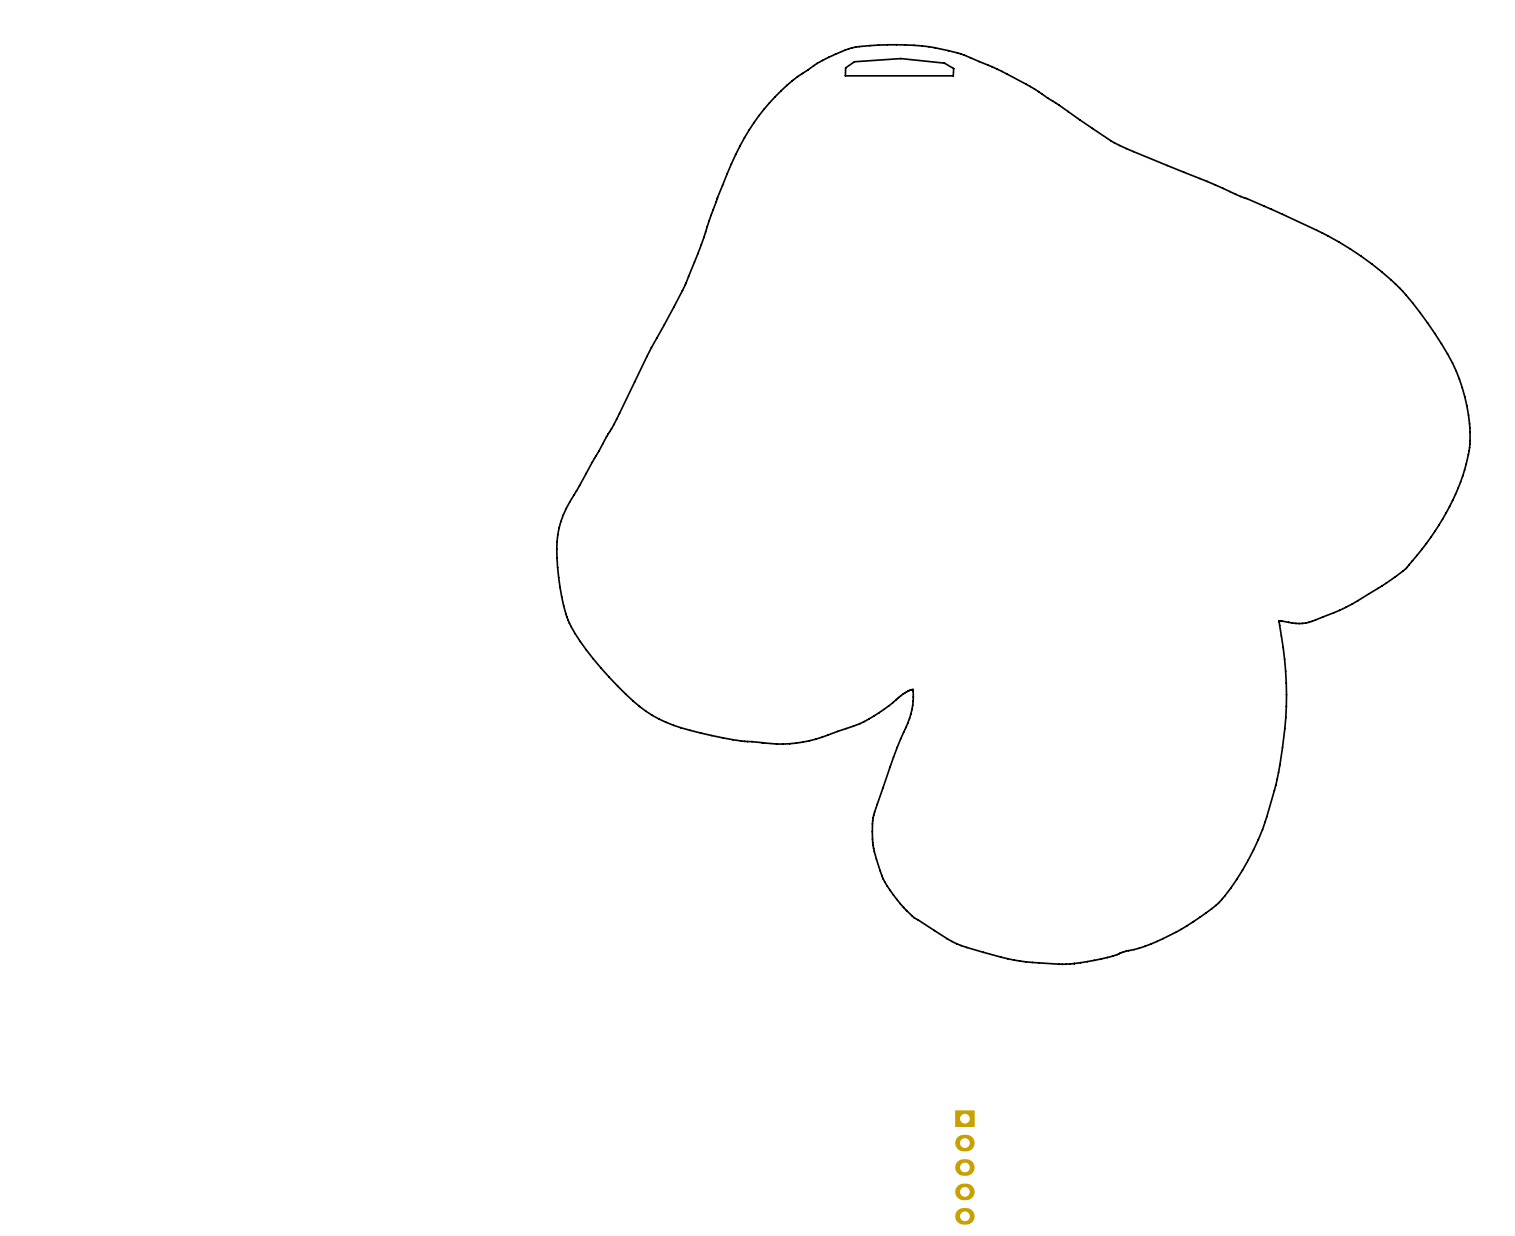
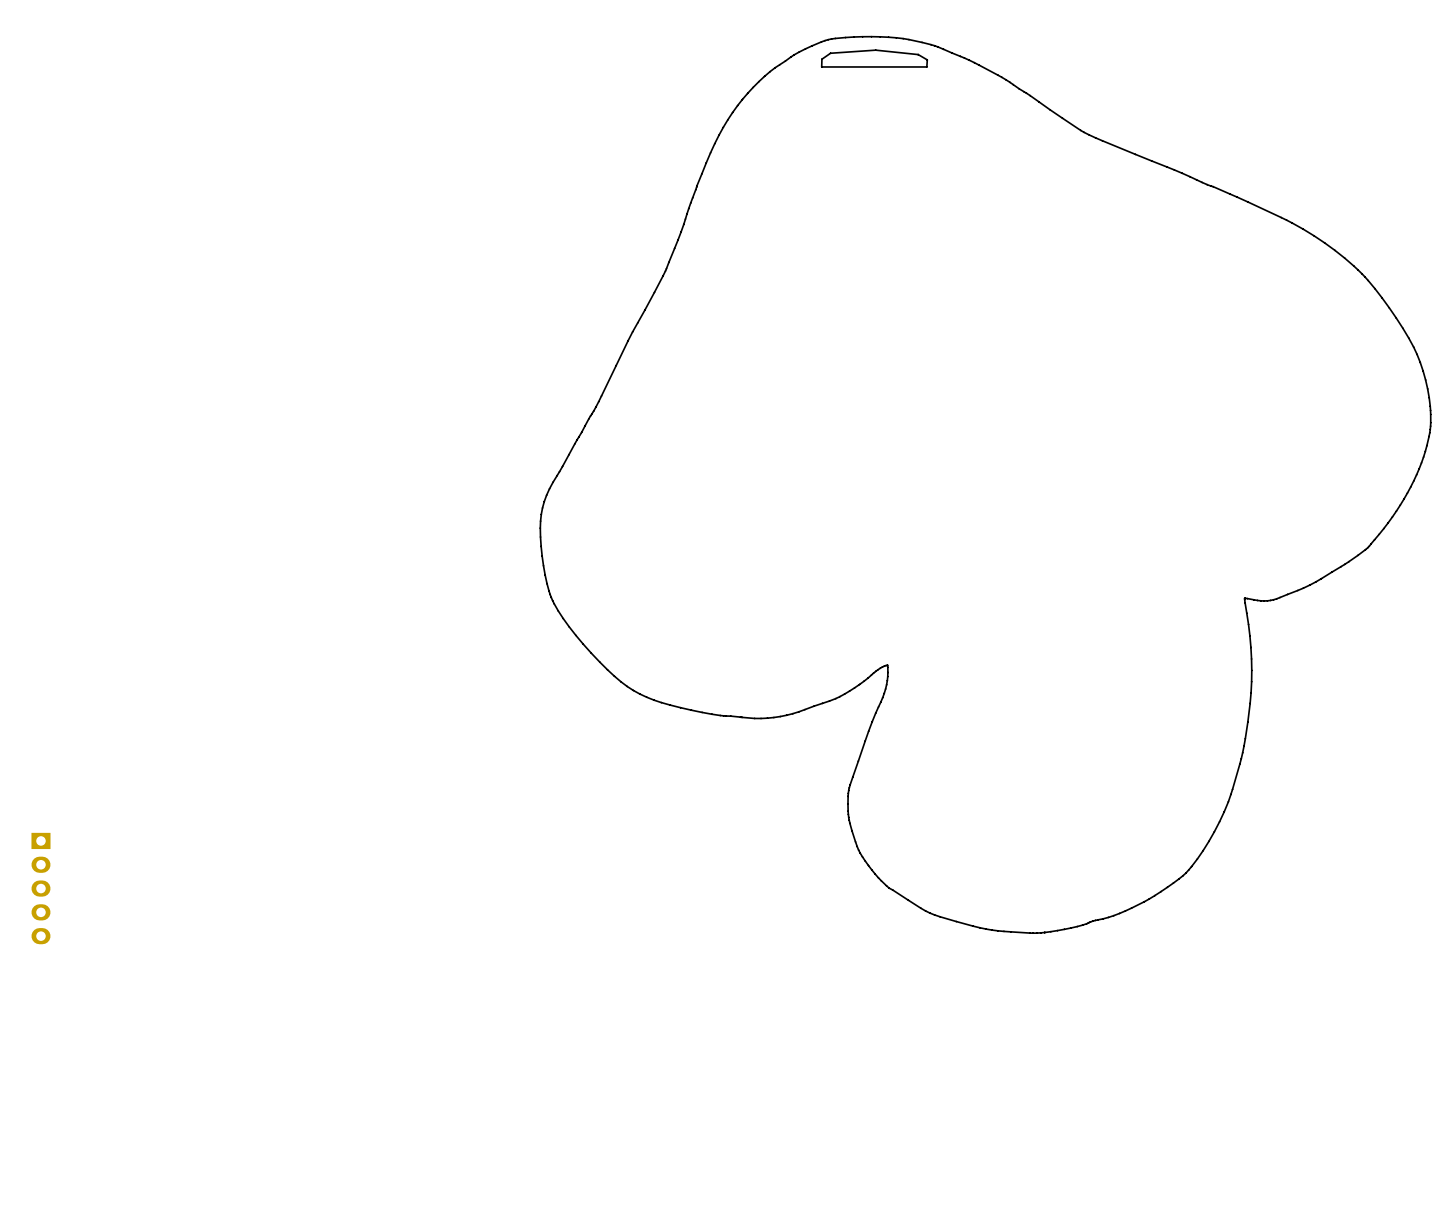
part: none -> (40, 888)
part: (964, 1167) -> none

